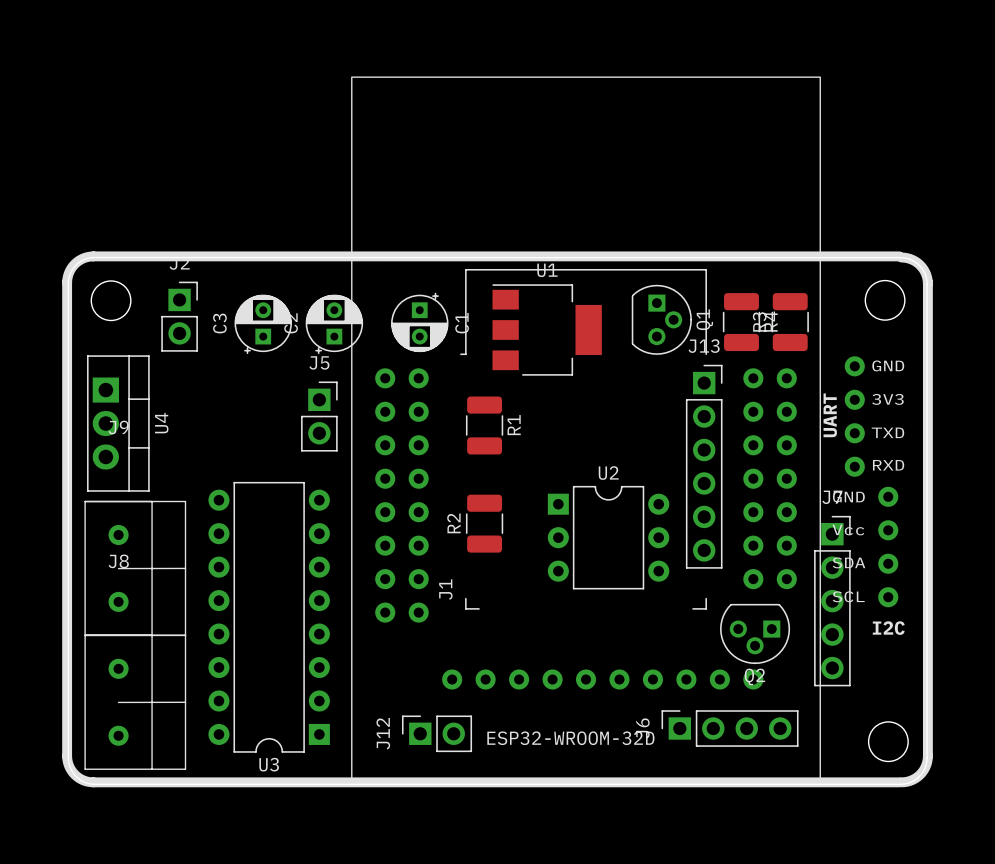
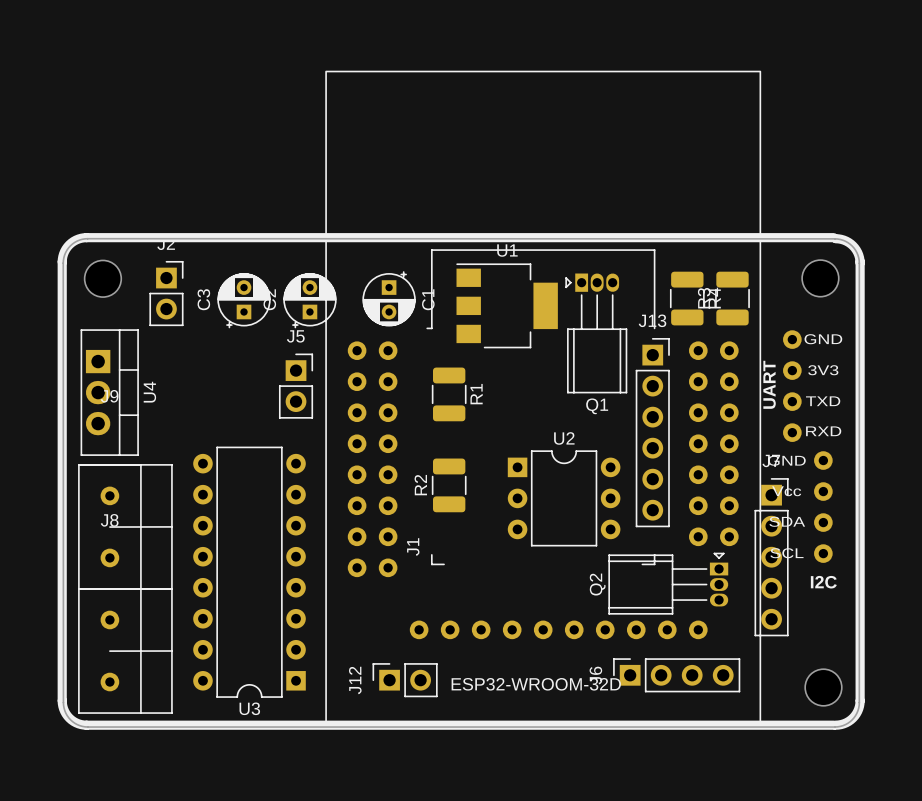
Q1 footprint: [631, 284, 692, 355] -> [565, 273, 628, 394]
Q1 name position: Q1 (704, 319) -> Q1 (597, 406)
Q2 footprint: [720, 603, 791, 665] -> [608, 552, 729, 615]
Q2 name position: Q2 (754, 676) -> Q2 (597, 584)

